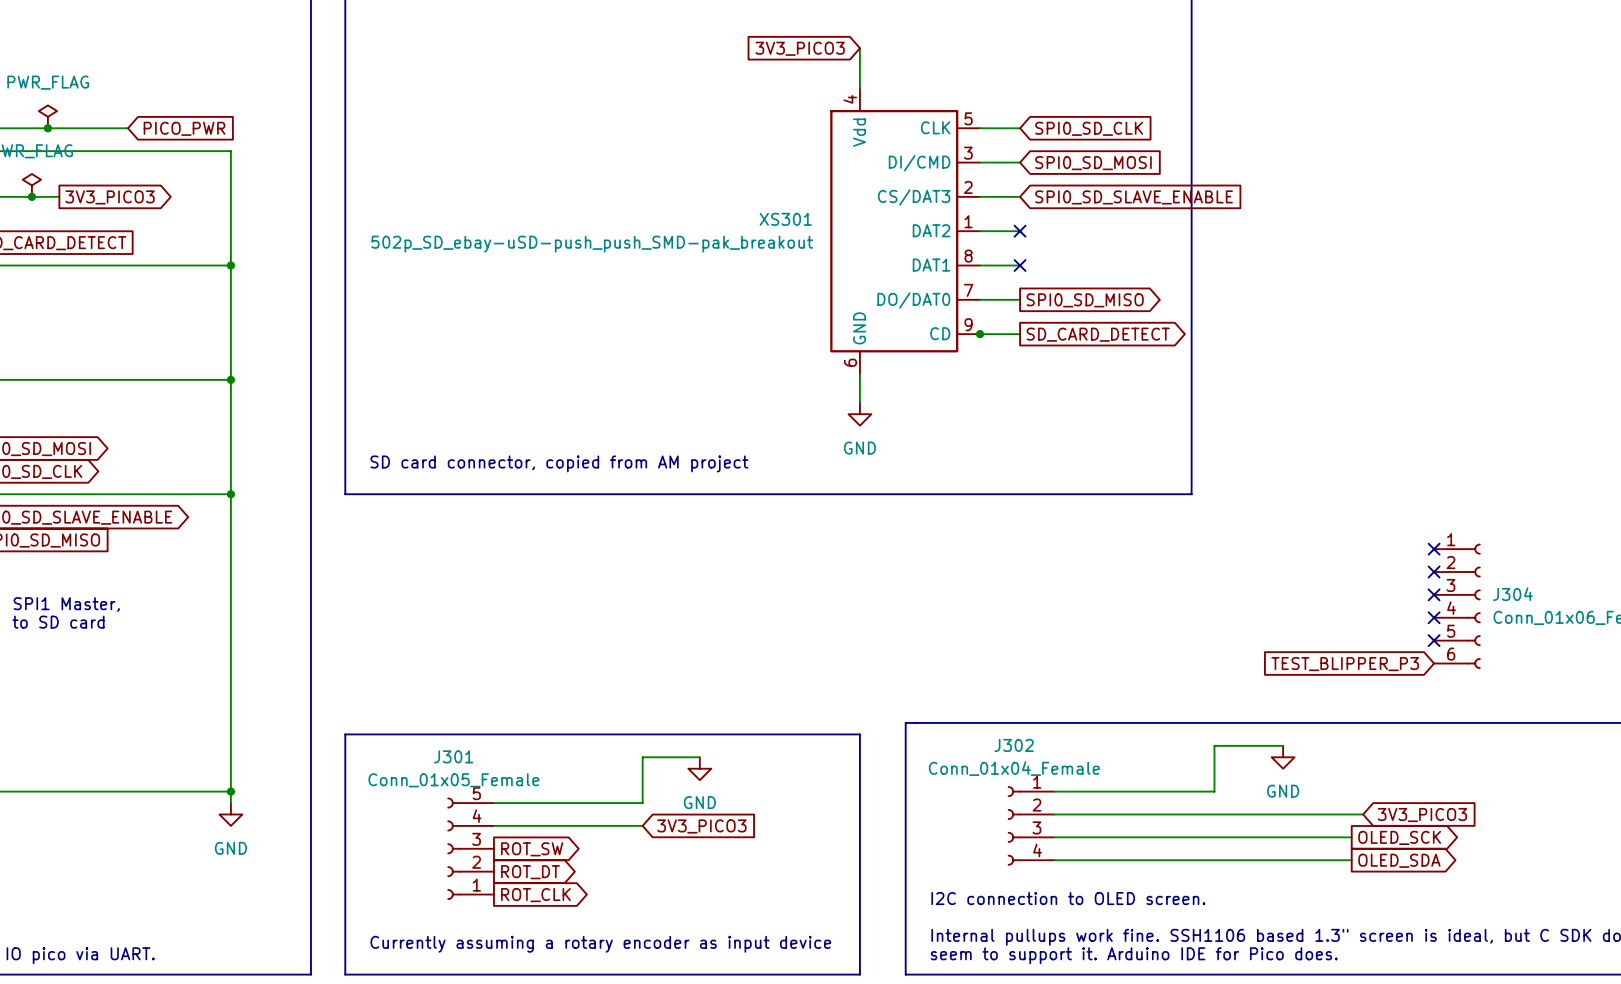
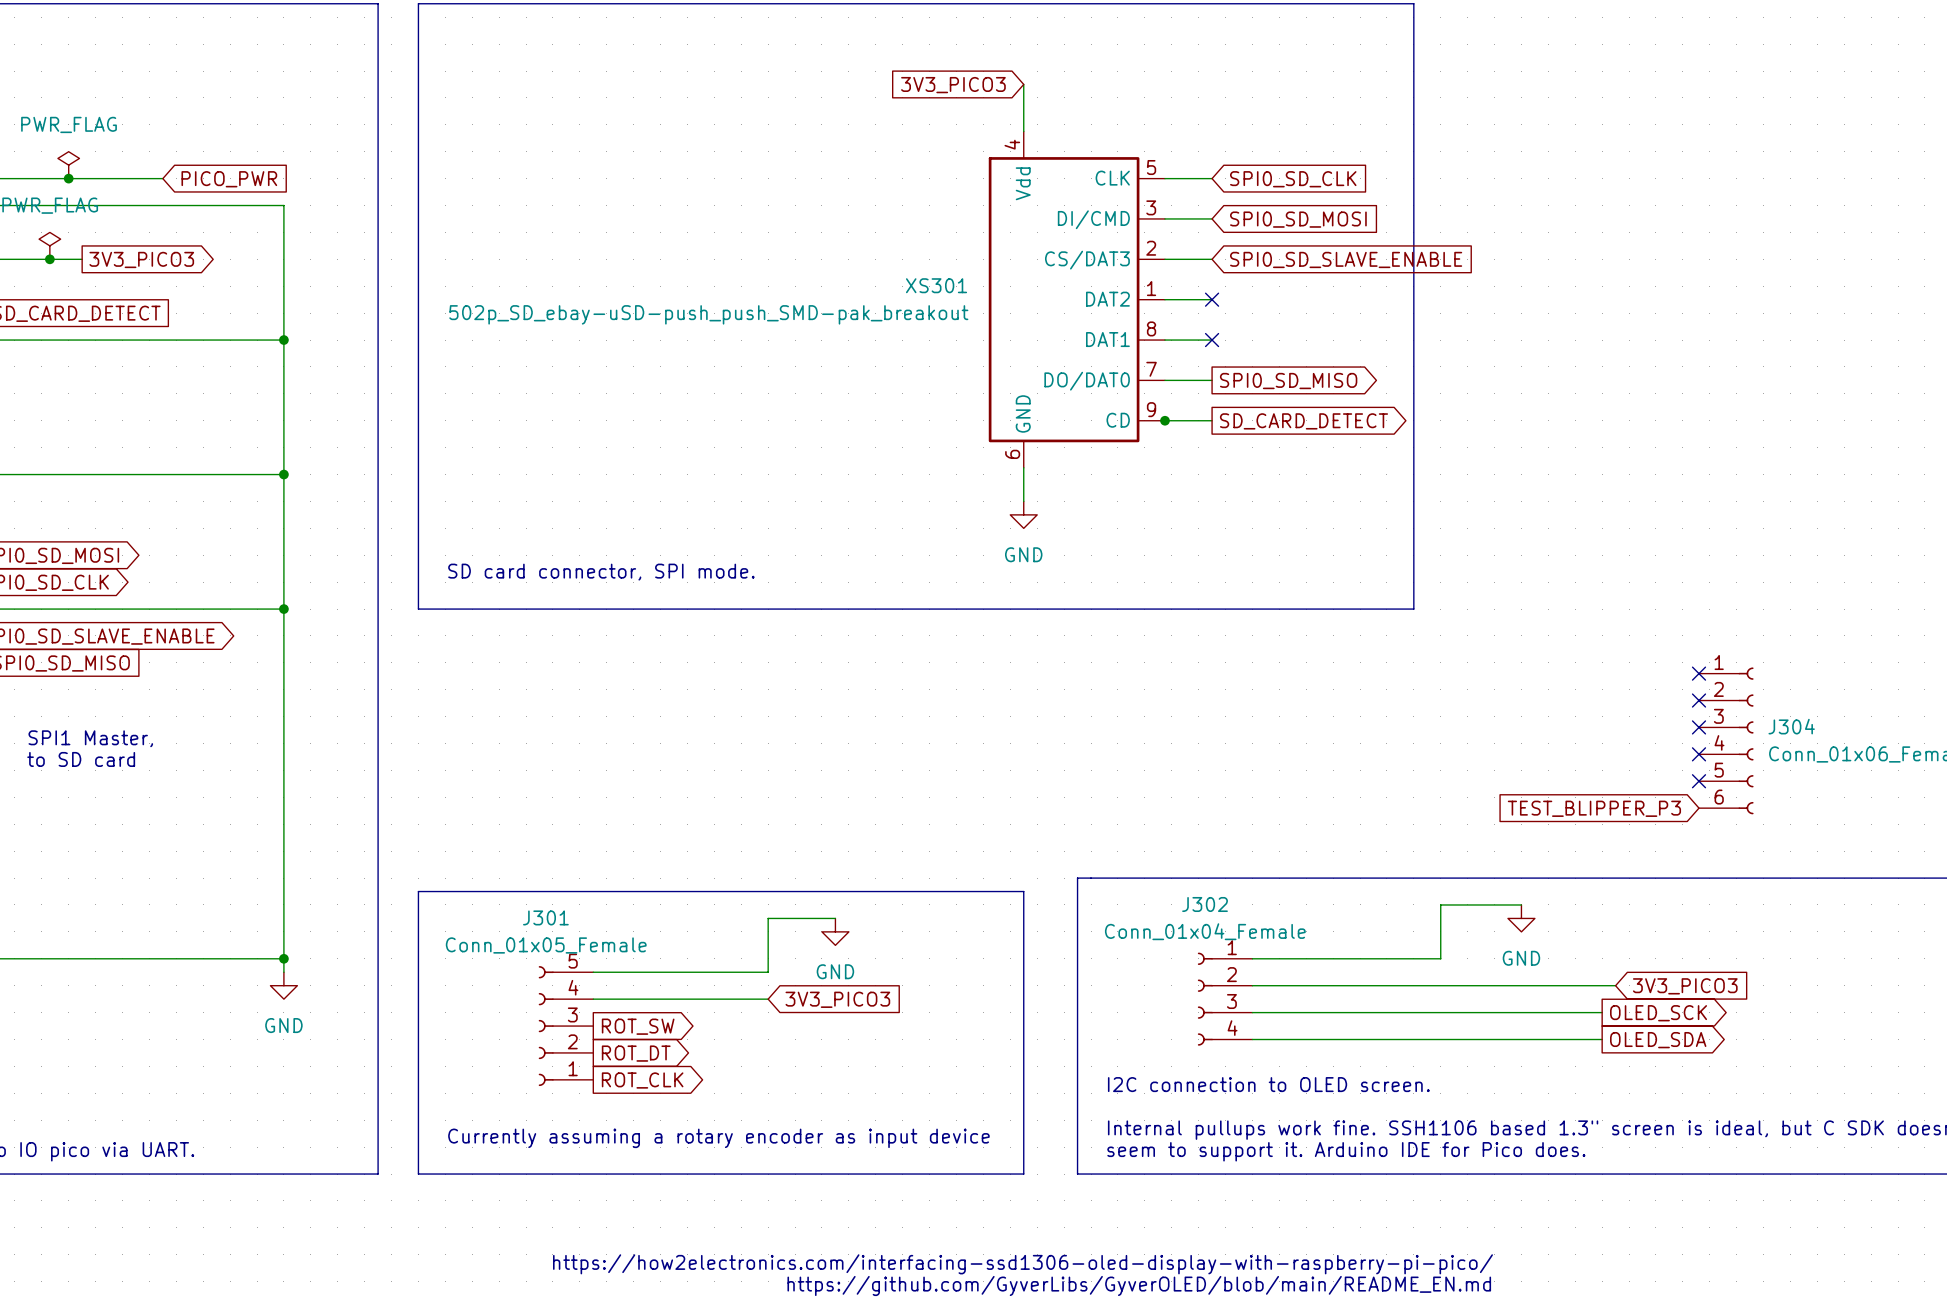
text: SD card connector, copied from AM project (559, 463) -> SD card connector, SPI mode. (601, 572)

